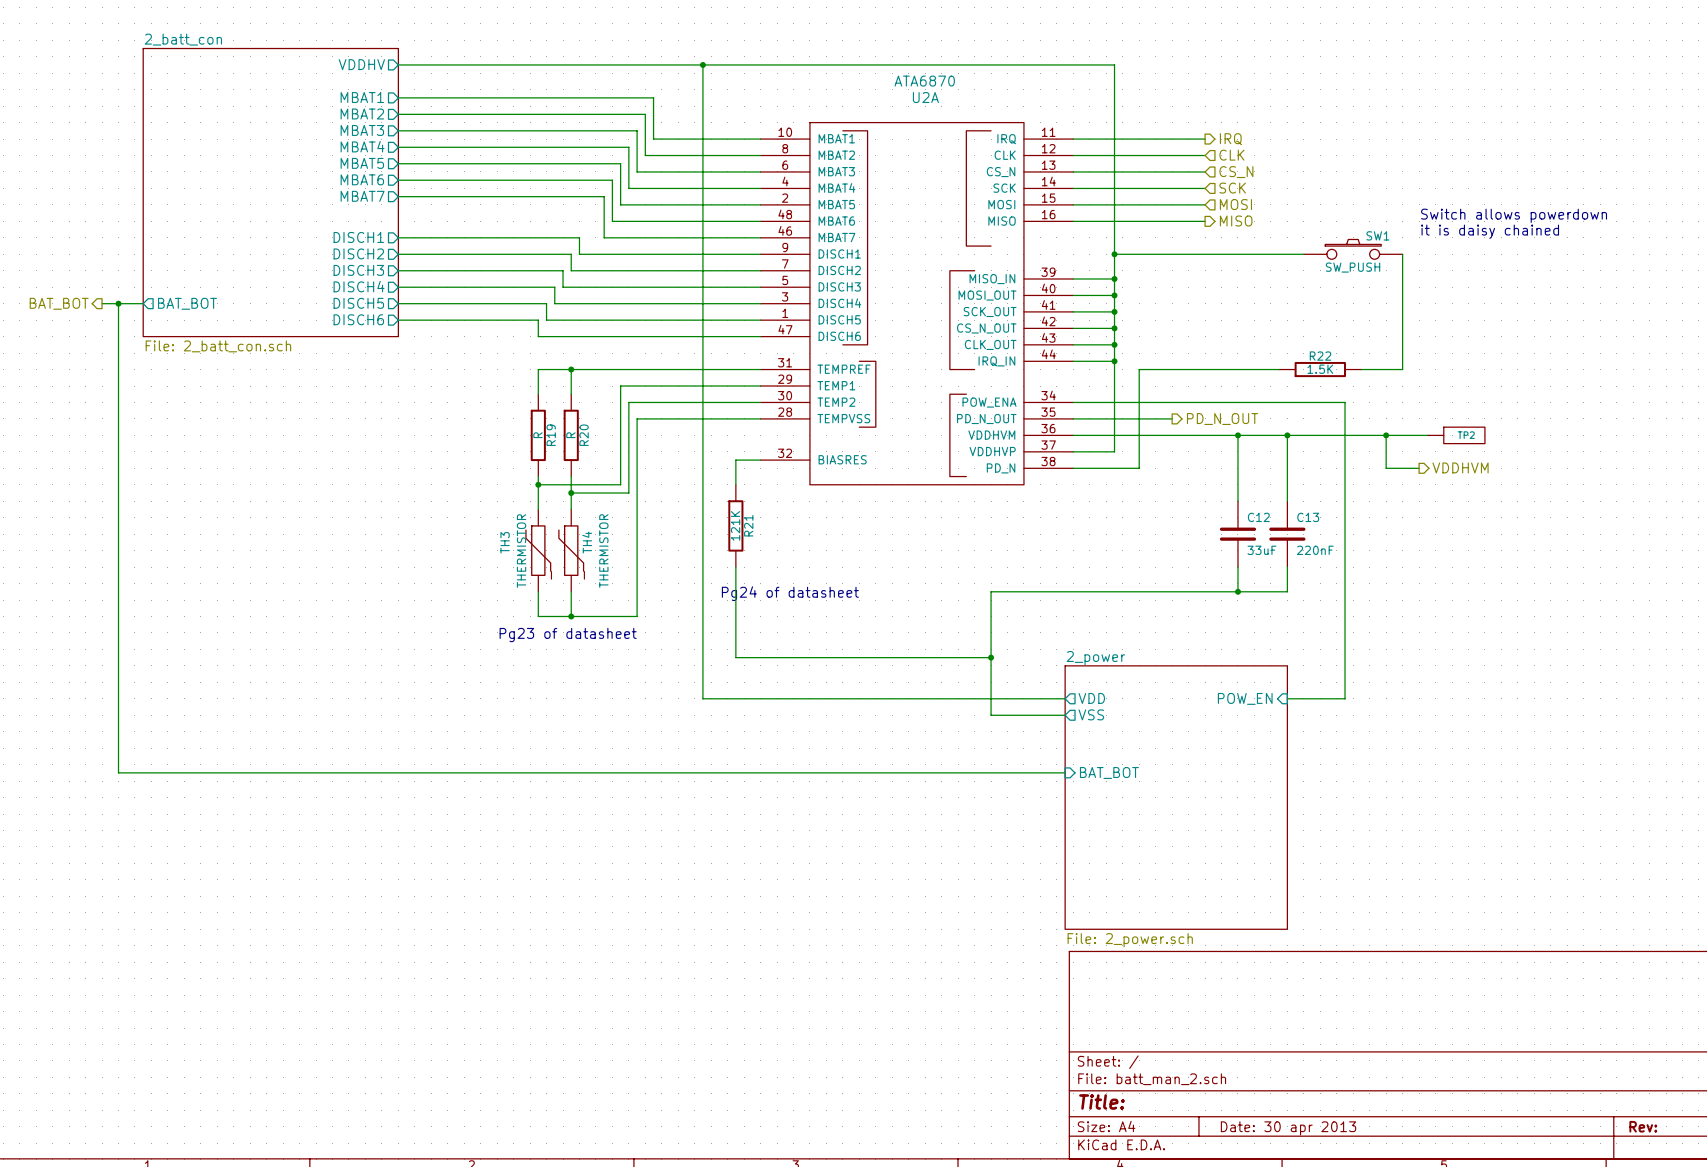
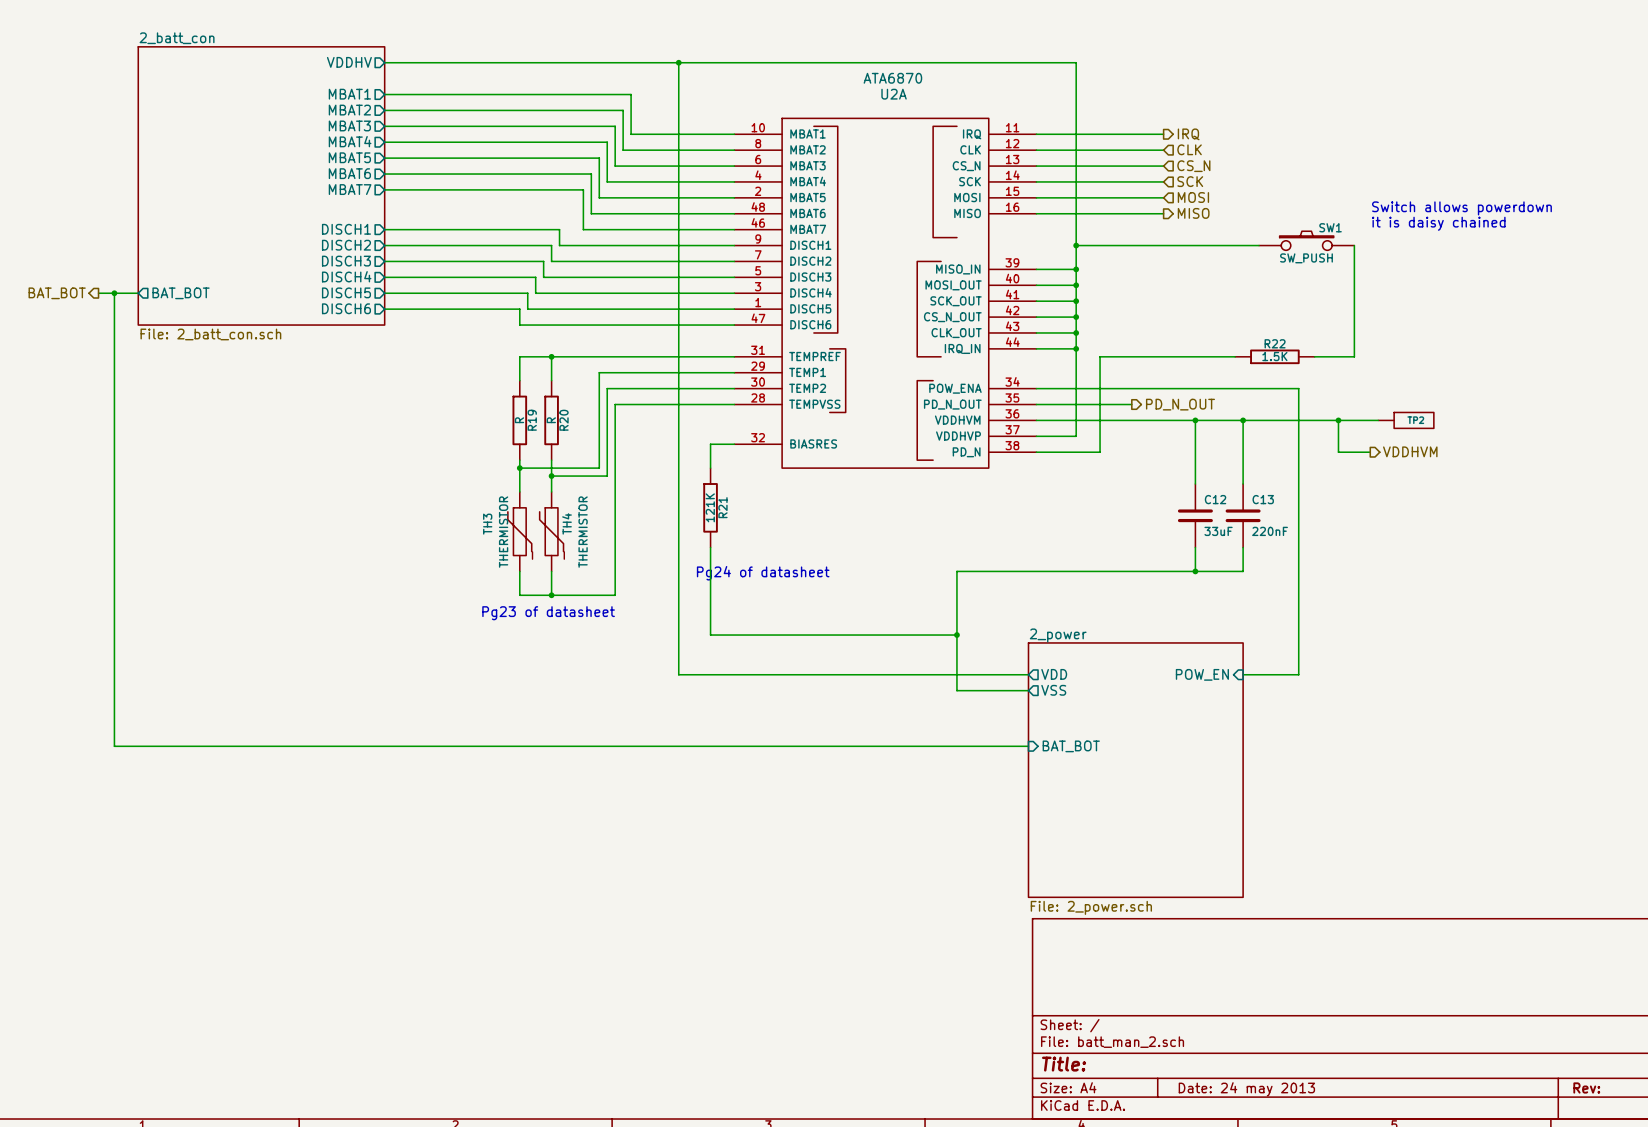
title block: Date: 30 apr 2013 (1288, 1128) -> Date: 24 may 2013 (1246, 1089)

